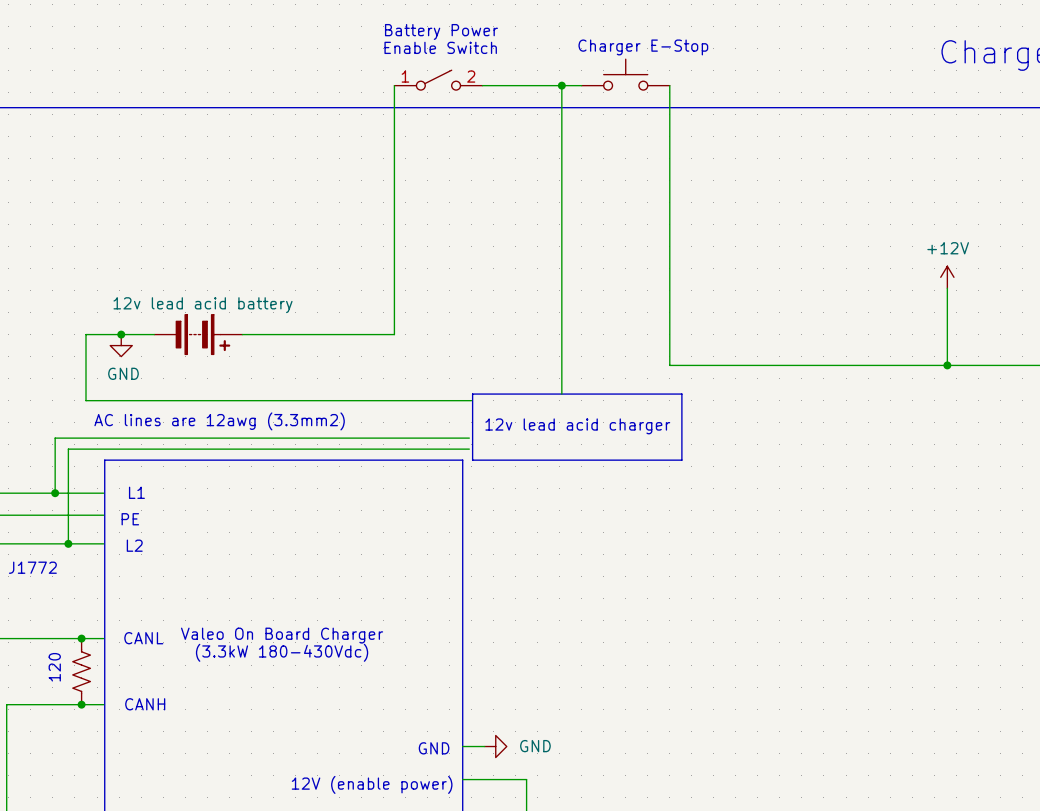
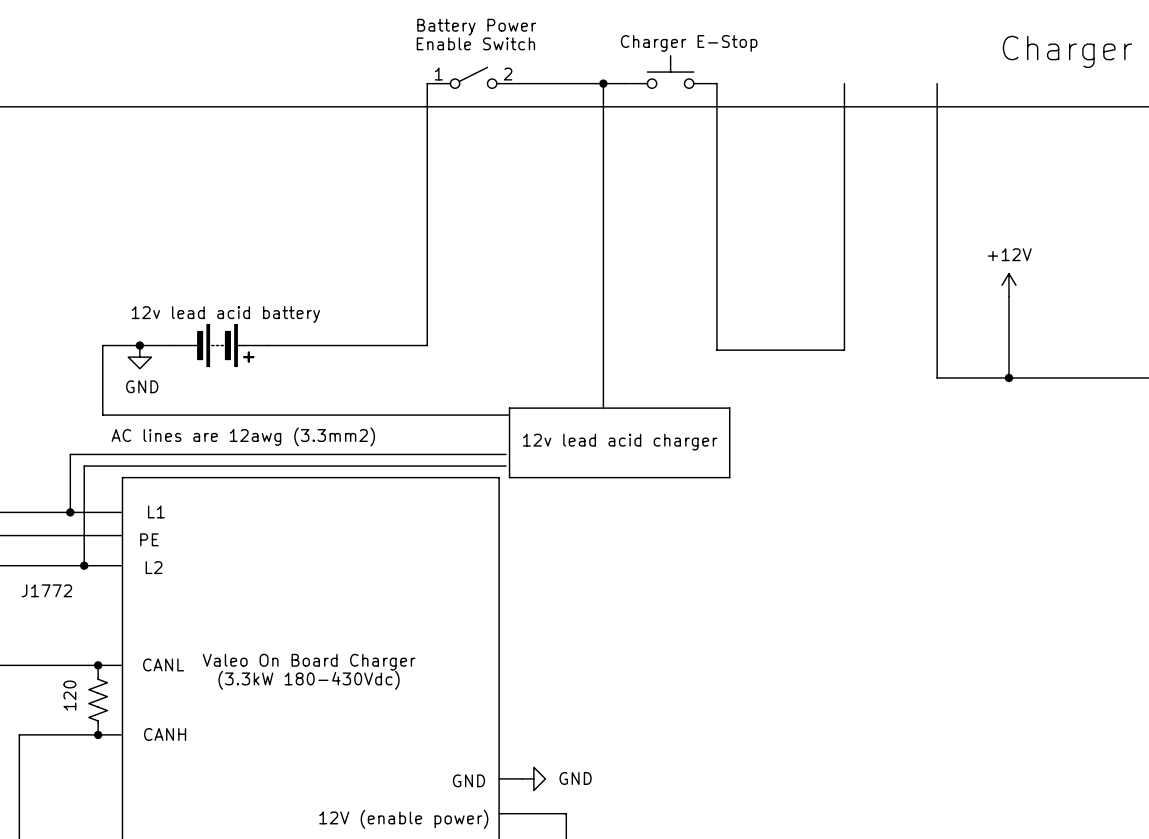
wire: none -> (937, 83) (937, 377)
wire: (669, 338) (669, 365) (879, 365) -> (716, 350) (844, 350) (844, 83)

